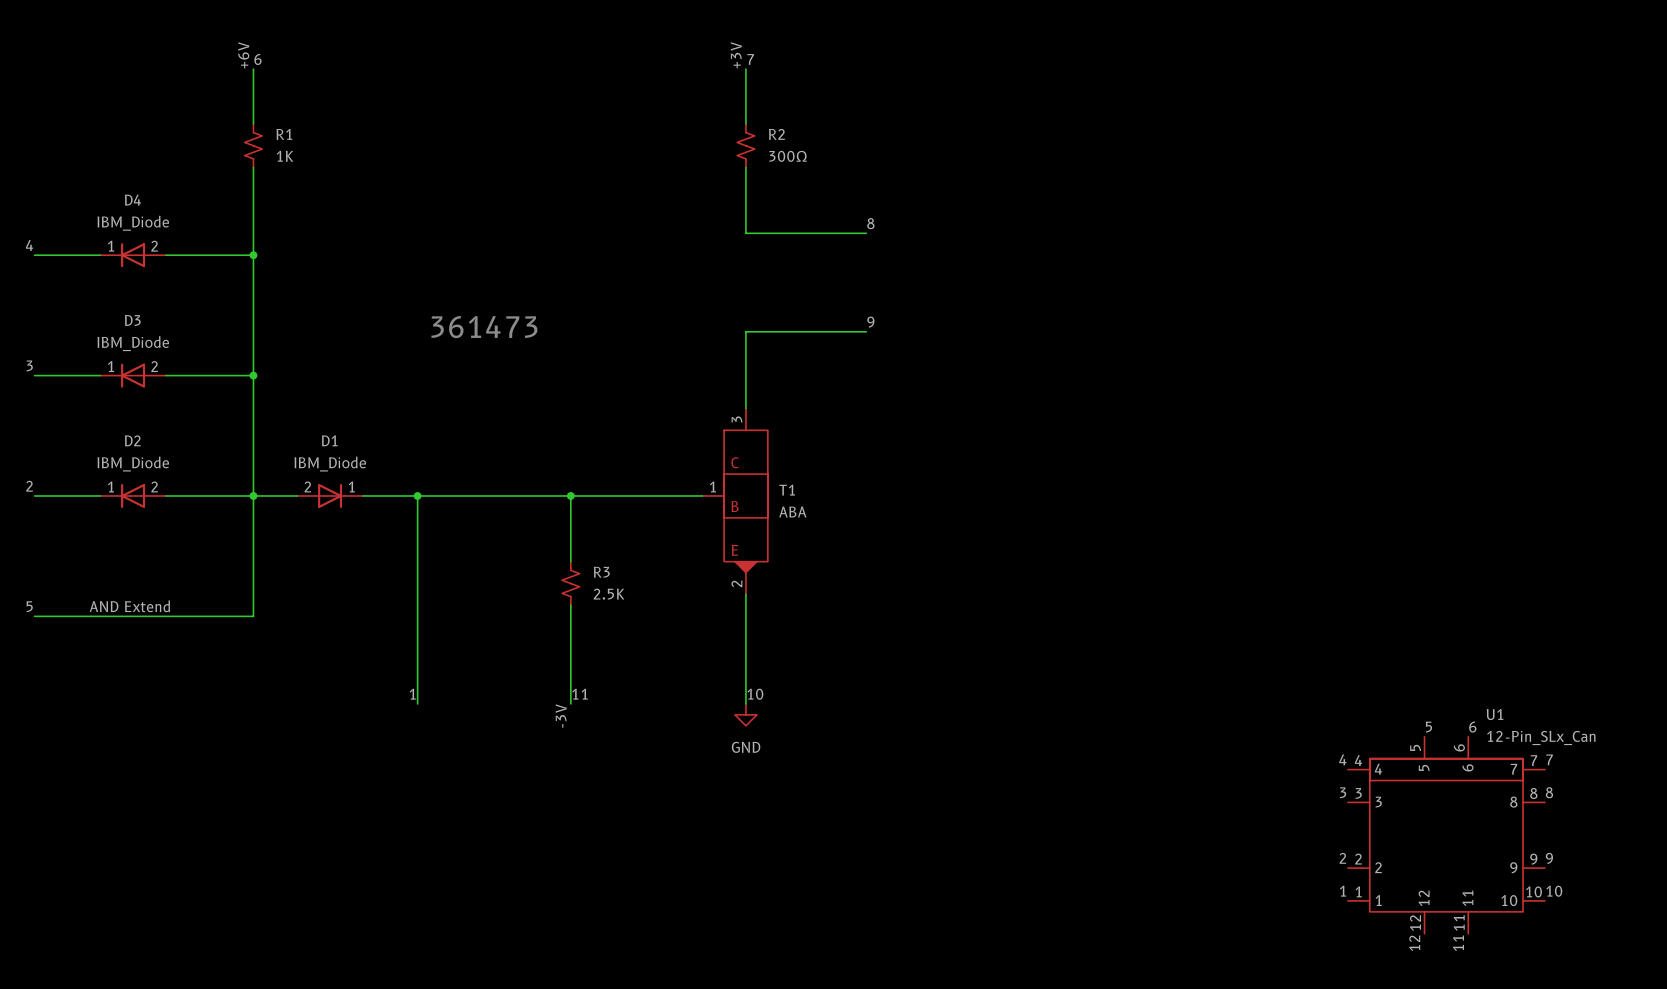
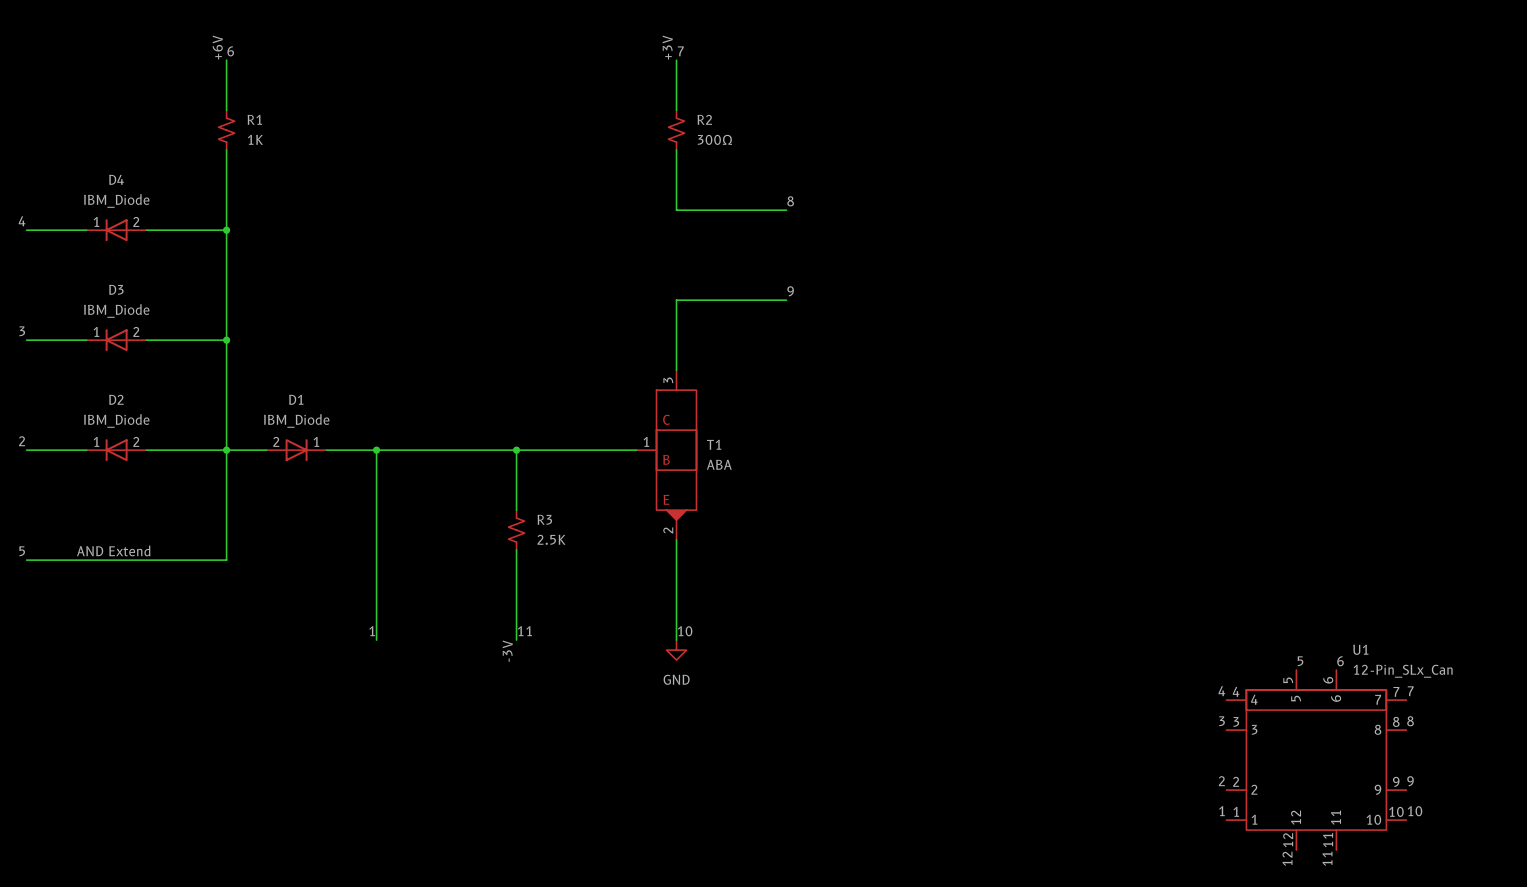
text: 361473 (484, 327) -> none

